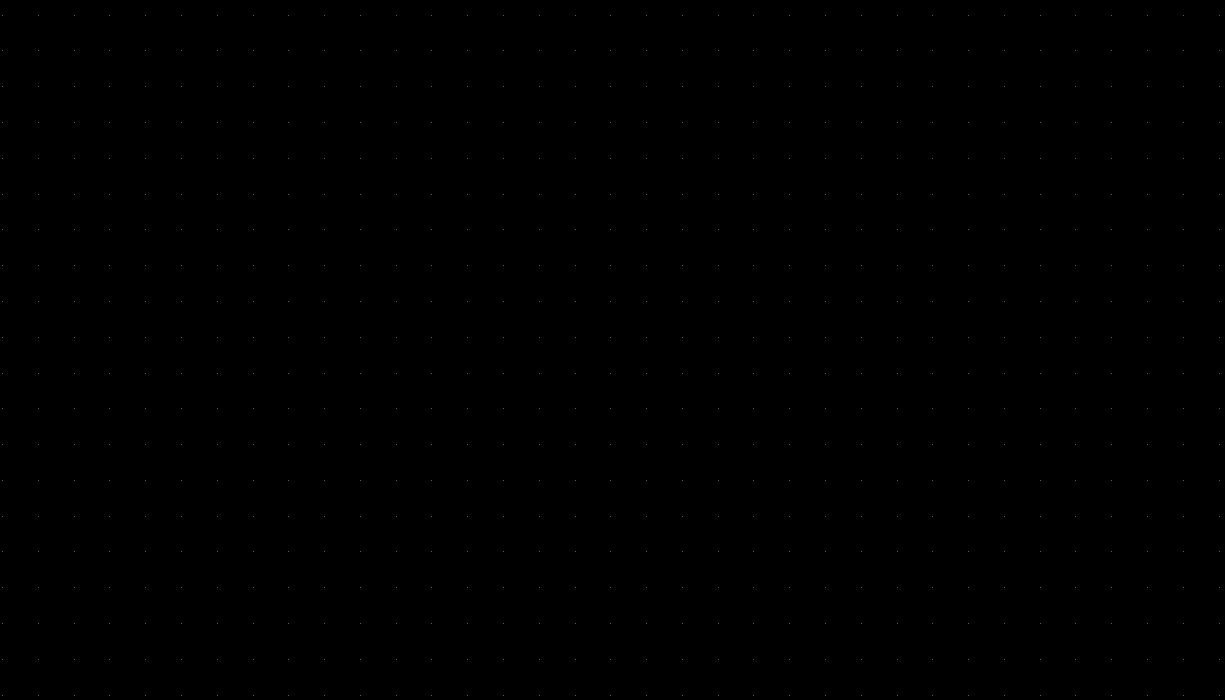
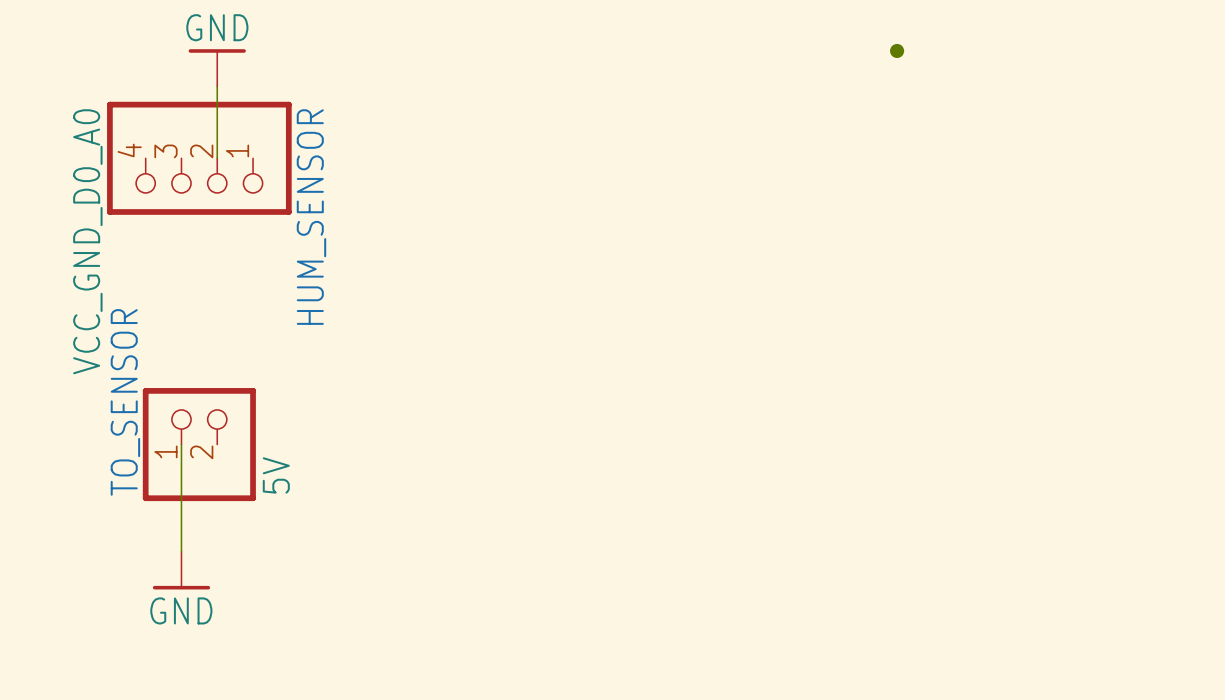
junction: none -> (897, 50)
power symbol: none -> GND (217, 67)
wire: none -> (217, 86) (217, 158)
HUM_SENSOR: none -> VCC_GND_D0_A0 (199, 158)
wire: none -> (181, 444) (181, 551)
TO_SENSOR: none -> 5V (199, 444)
power symbol: none -> GND (181, 570)

